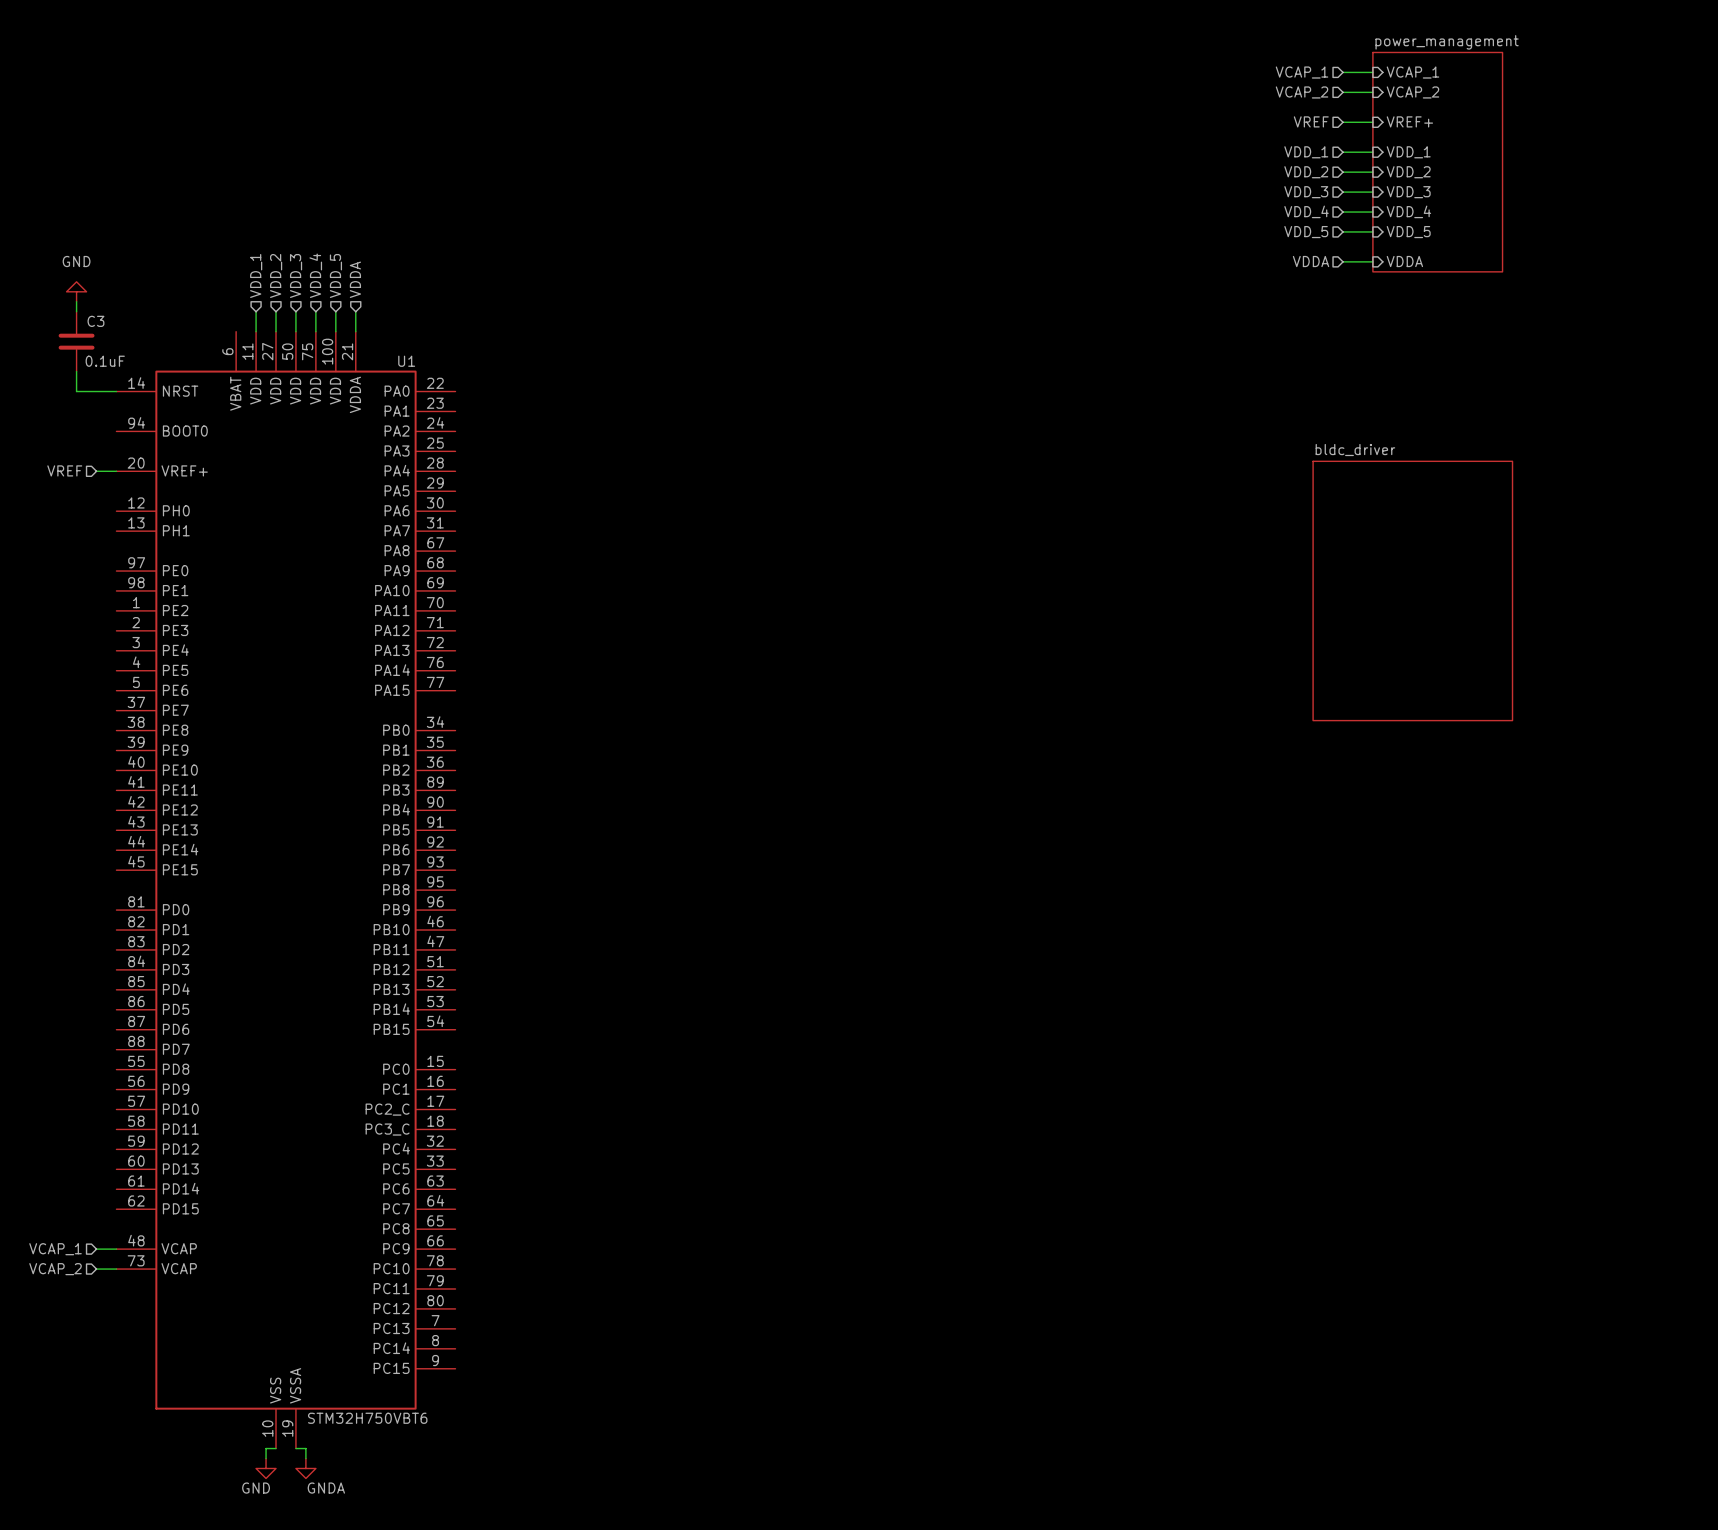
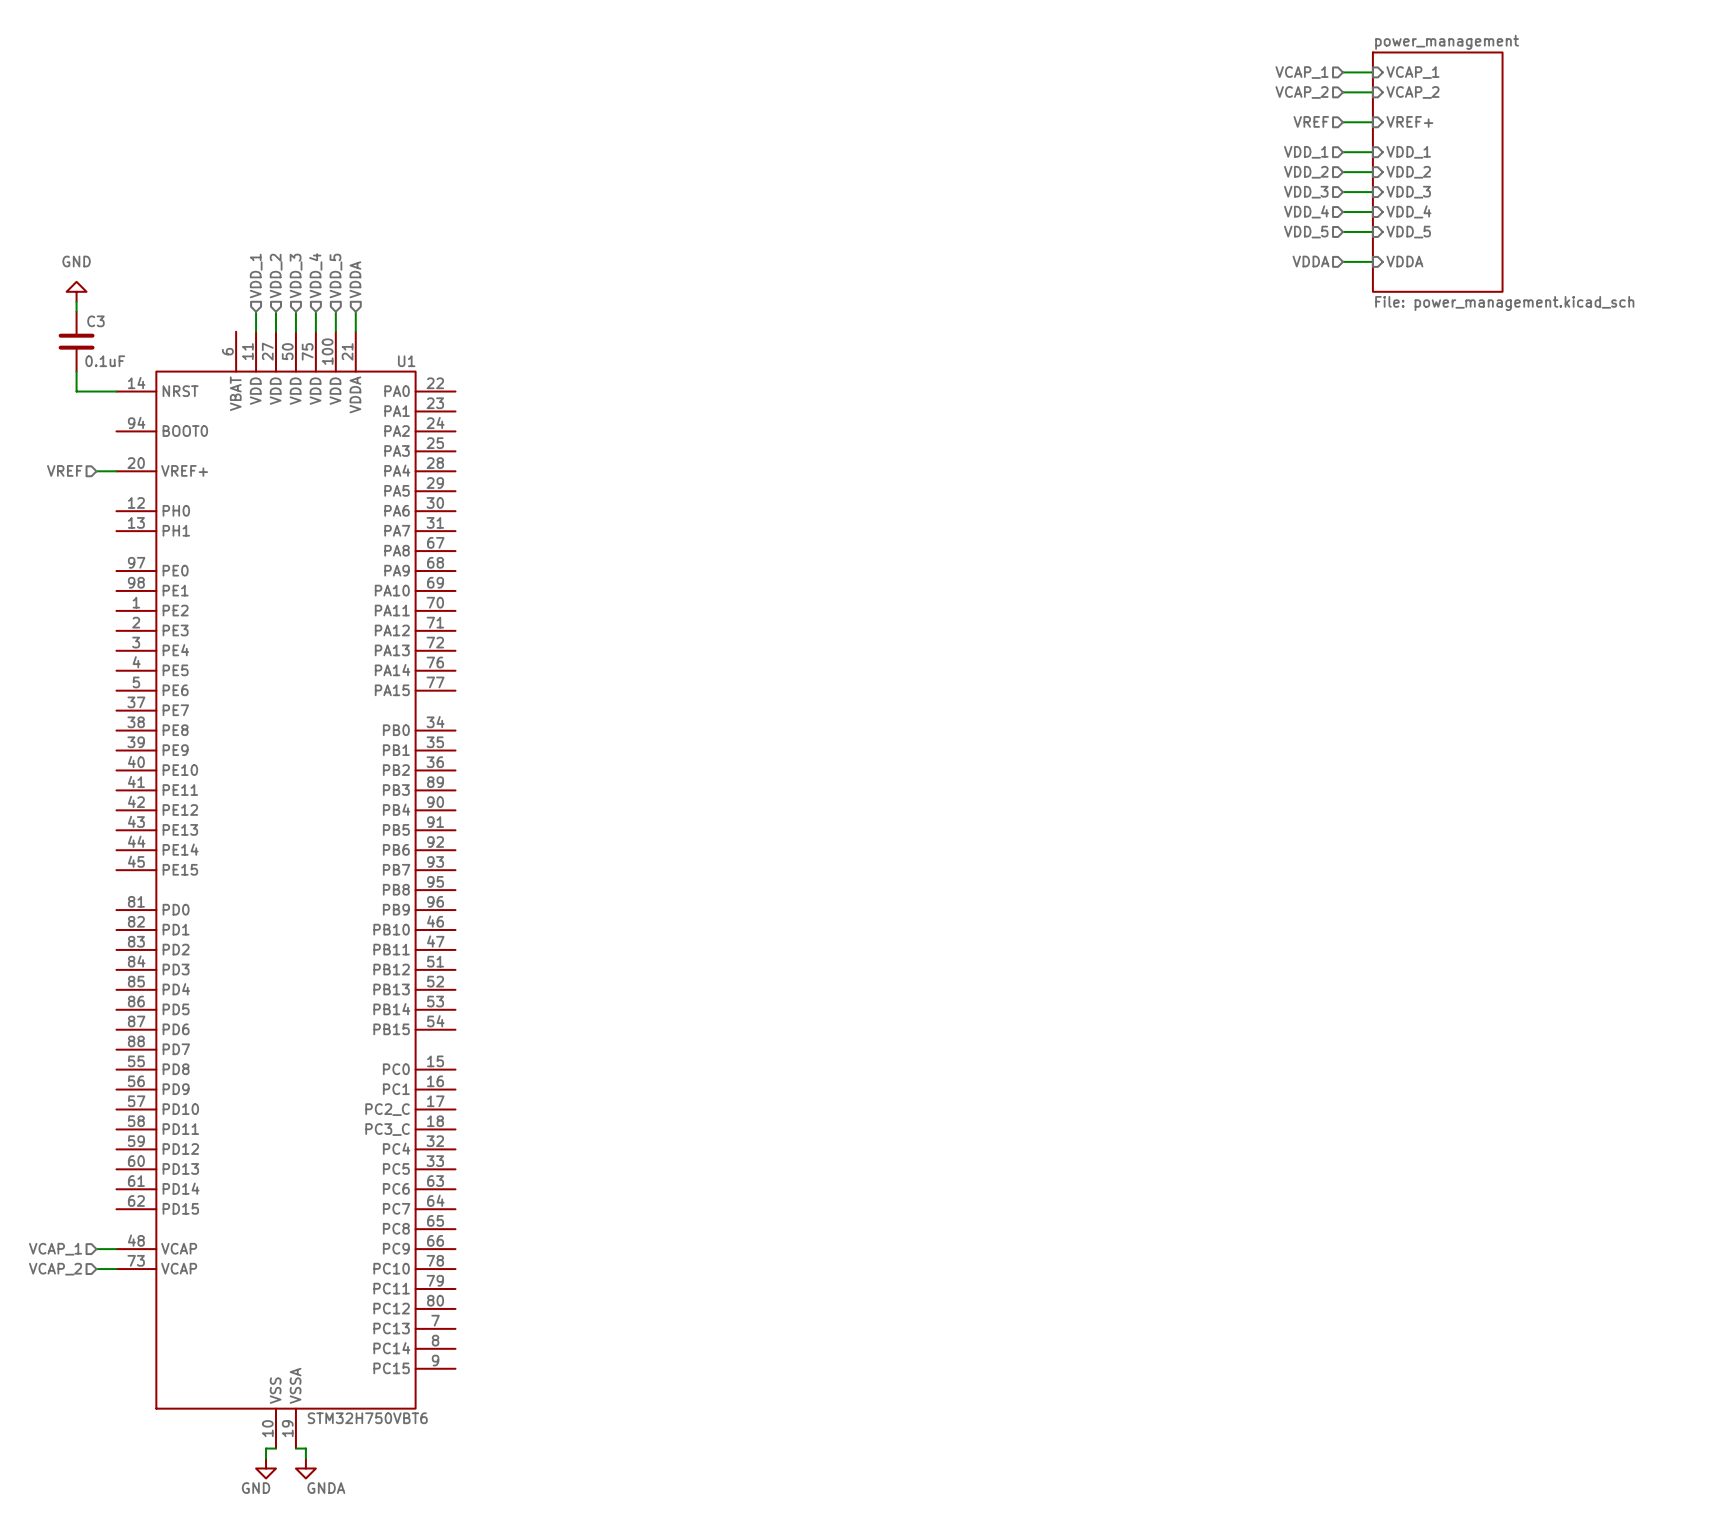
sheet power_management: (1437, 162) -> none
sheet power_management: none -> File: power_management.kicad_sch (1437, 172)
sheet bldc_driver: (1412, 590) -> none

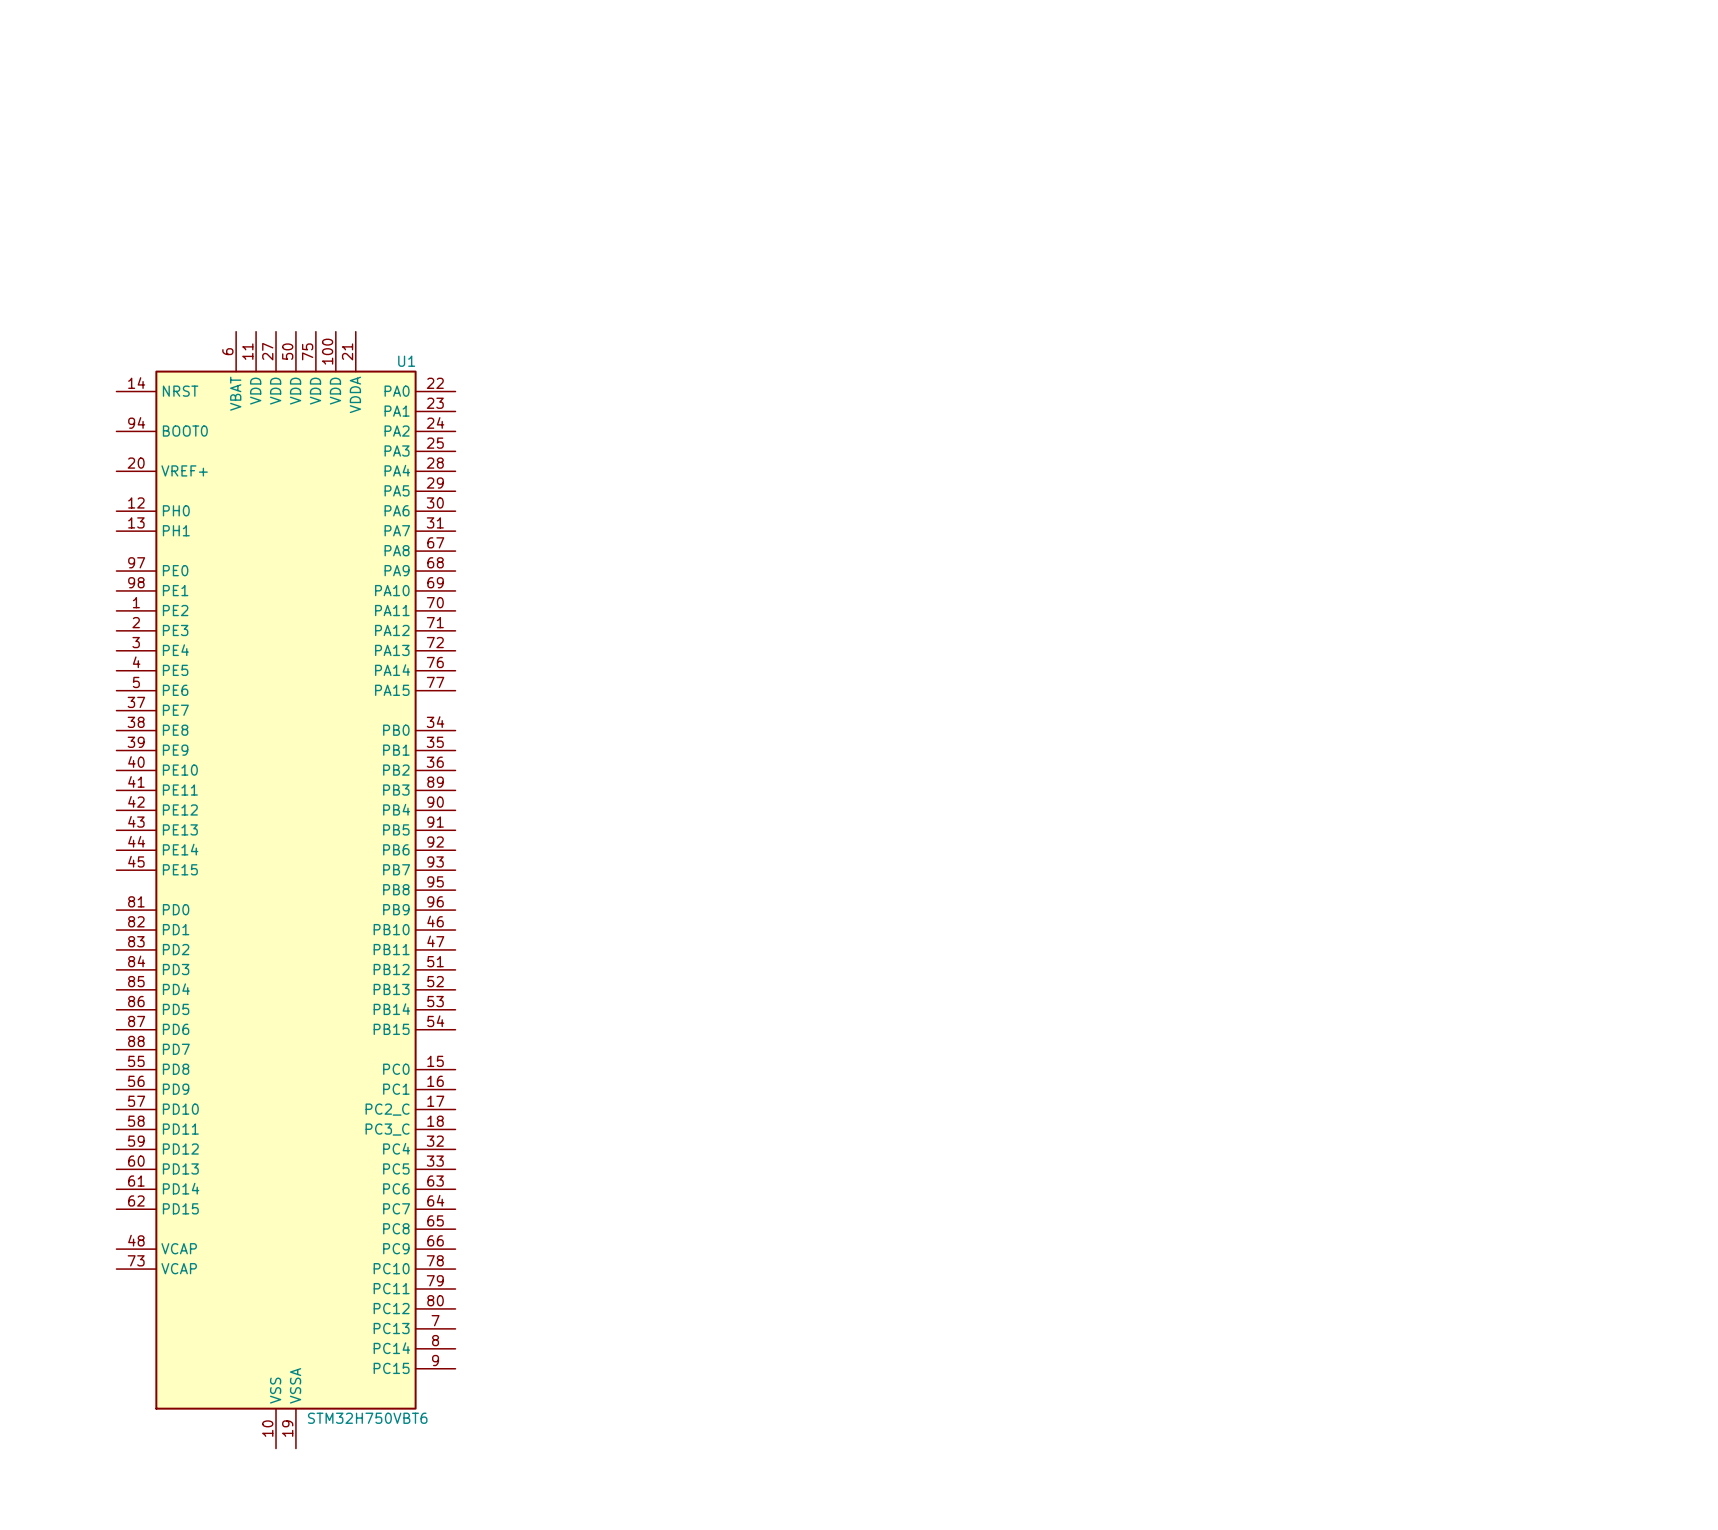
hierarchical label: VCAP_1 (1302, 72) -> none
wire: (1343, 72) (1372, 72) -> none
sheet pin: VCAP_1 (1412, 72) -> none
hierarchical label: VCAP_2 (1302, 92) -> none
wire: (1343, 92) (1372, 92) -> none
sheet pin: VCAP_2 (1412, 92) -> none
hierarchical label: VREF (1311, 121) -> none
sheet pin: VREF+ (1409, 121) -> none
wire: (1343, 122) (1372, 122) -> none
hierarchical label: VDD_1 (1306, 152) -> none
wire: (1343, 152) (1372, 152) -> none
sheet pin: VDD_1 (1408, 152) -> none
hierarchical label: VDD_2 (1306, 172) -> none
wire: (1343, 172) (1372, 172) -> none
sheet pin: VDD_2 (1408, 172) -> none
sheet power_management: File: power_management.kicad_sch (1437, 172) -> none
hierarchical label: VDD_3 (1306, 192) -> none
wire: (1343, 192) (1372, 192) -> none
sheet pin: VDD_3 (1408, 192) -> none
hierarchical label: VDD_4 (1306, 211) -> none
sheet pin: VDD_4 (1408, 211) -> none
wire: (1343, 212) (1372, 212) -> none
wire: (1343, 231) (1372, 231) -> none
hierarchical label: VDD_5 (1306, 232) -> none
sheet pin: VDD_5 (1408, 232) -> none
hierarchical label: VDDA (1311, 261) -> none
wire: (1343, 261) (1372, 261) -> none
sheet pin: VDDA (1404, 261) -> none
hierarchical label: VDD_1 (256, 275) -> none
hierarchical label: VDD_2 (276, 275) -> none
hierarchical label: VDD_3 (296, 275) -> none
hierarchical label: VDD_4 (315, 275) -> none
hierarchical label: VDD_5 (335, 275) -> none
hierarchical label: VDDA (355, 279) -> none
power symbol: GND (76, 291) -> none
wire: (76, 301) (76, 311) -> none
wire: (256, 311) (256, 331) -> none
wire: (276, 311) (276, 331) -> none
wire: (295, 311) (295, 331) -> none
wire: (315, 311) (315, 331) -> none
wire: (335, 311) (335, 331) -> none
wire: (355, 311) (355, 331) -> none
C3: 0.1uF (76, 341) -> none
wire: (76, 371) (76, 391) (116, 391) -> none
hierarchical label: VREF (64, 470) -> none
wire: (96, 471) (116, 471) -> none
hierarchical label: VCAP_1 (55, 1249) -> none
wire: (96, 1249) (116, 1249) -> none
hierarchical label: VCAP_2 (55, 1269) -> none
wire: (96, 1269) (116, 1269) -> none
wire: (276, 1448) (266, 1448) (266, 1458) -> none
wire: (295, 1448) (305, 1448) (305, 1458) -> none
power symbol: GND (266, 1468) -> none
power symbol: GNDA (305, 1468) -> none

